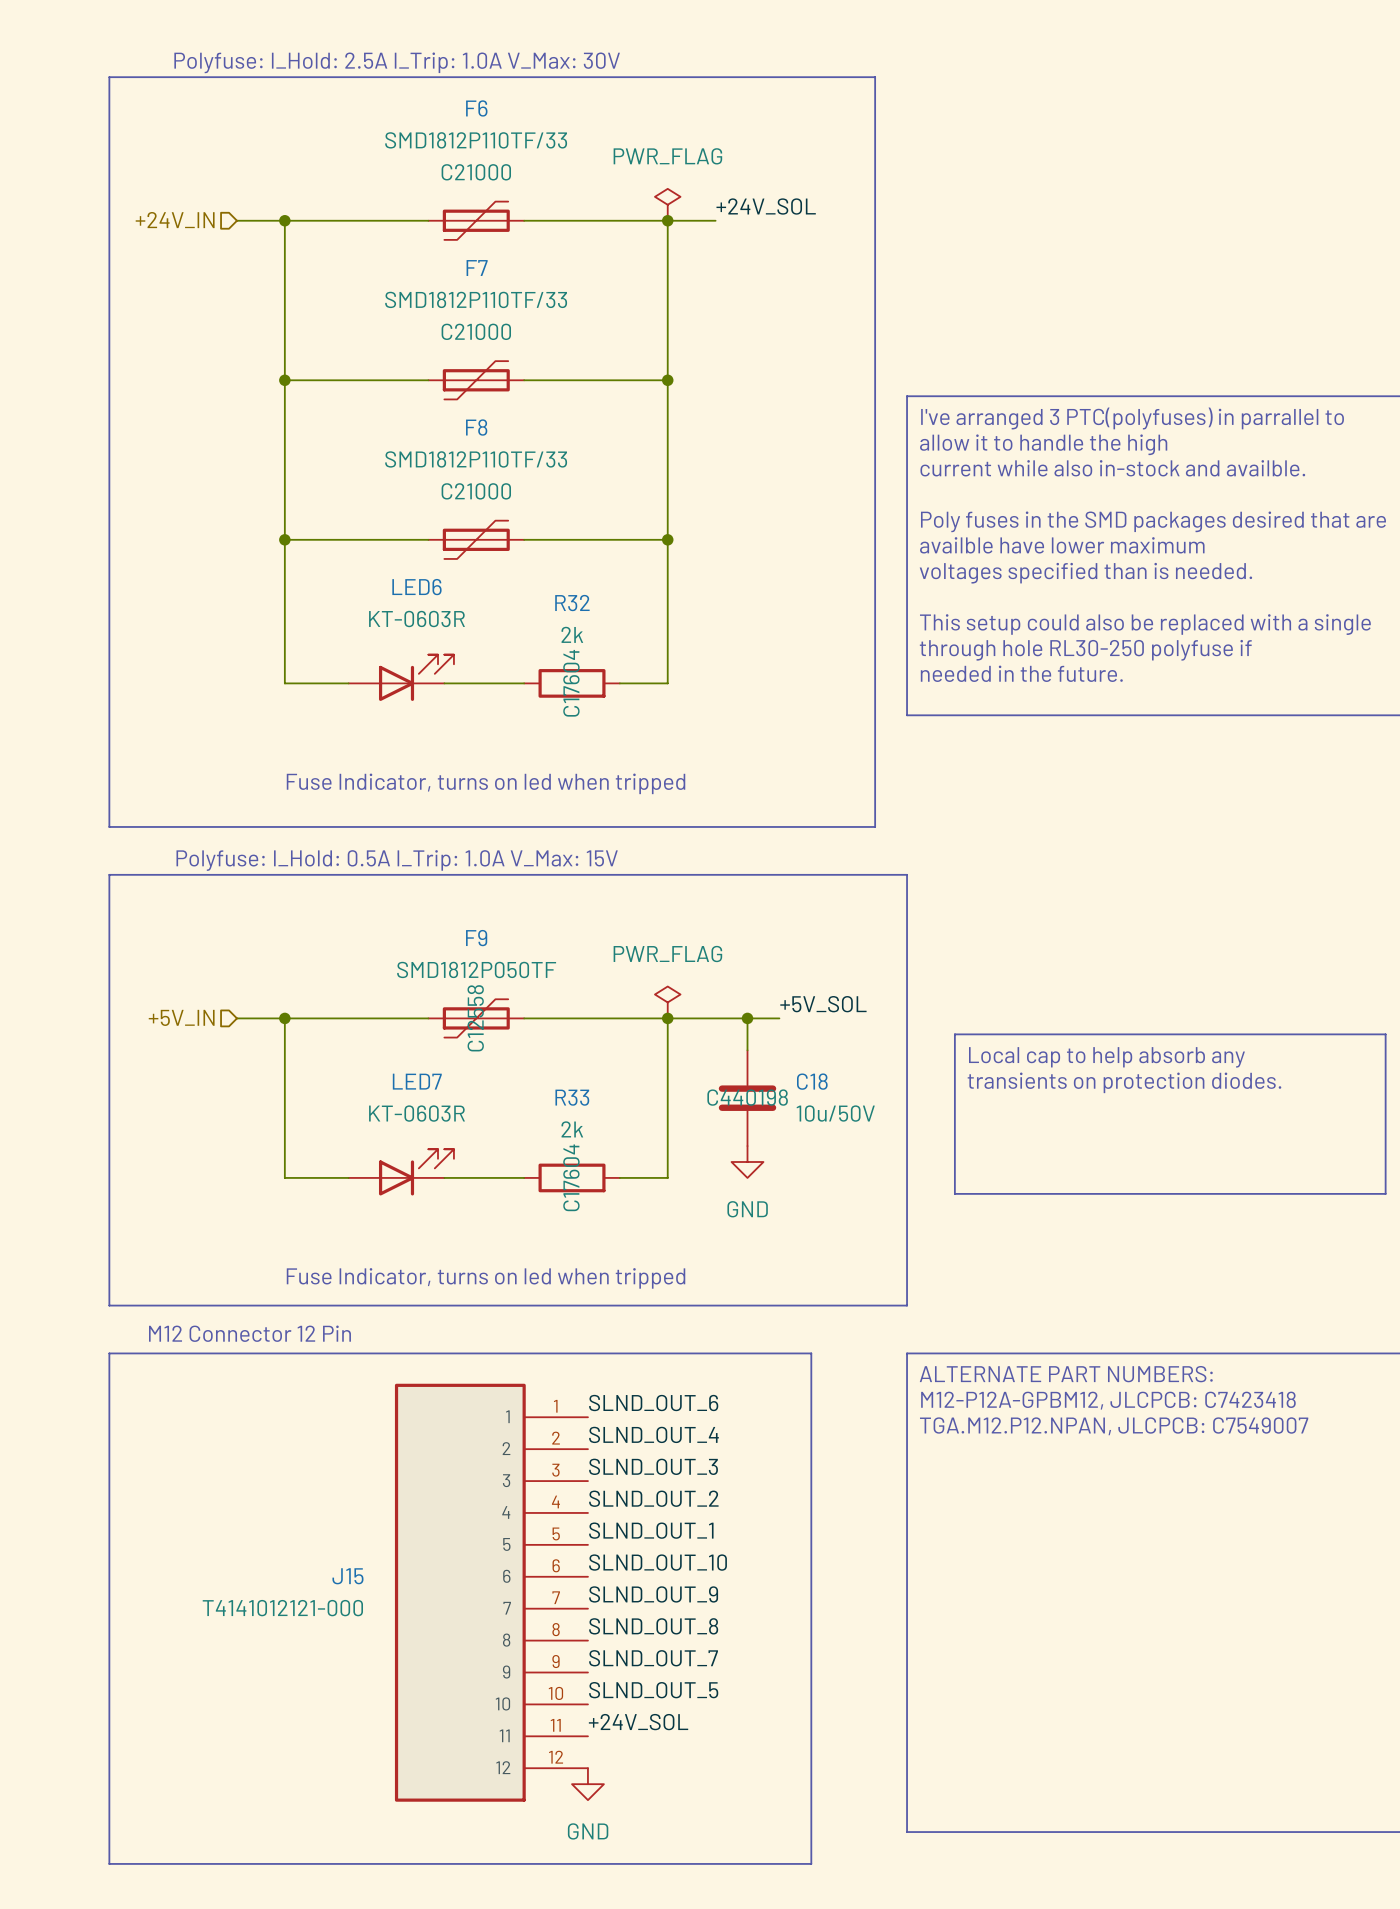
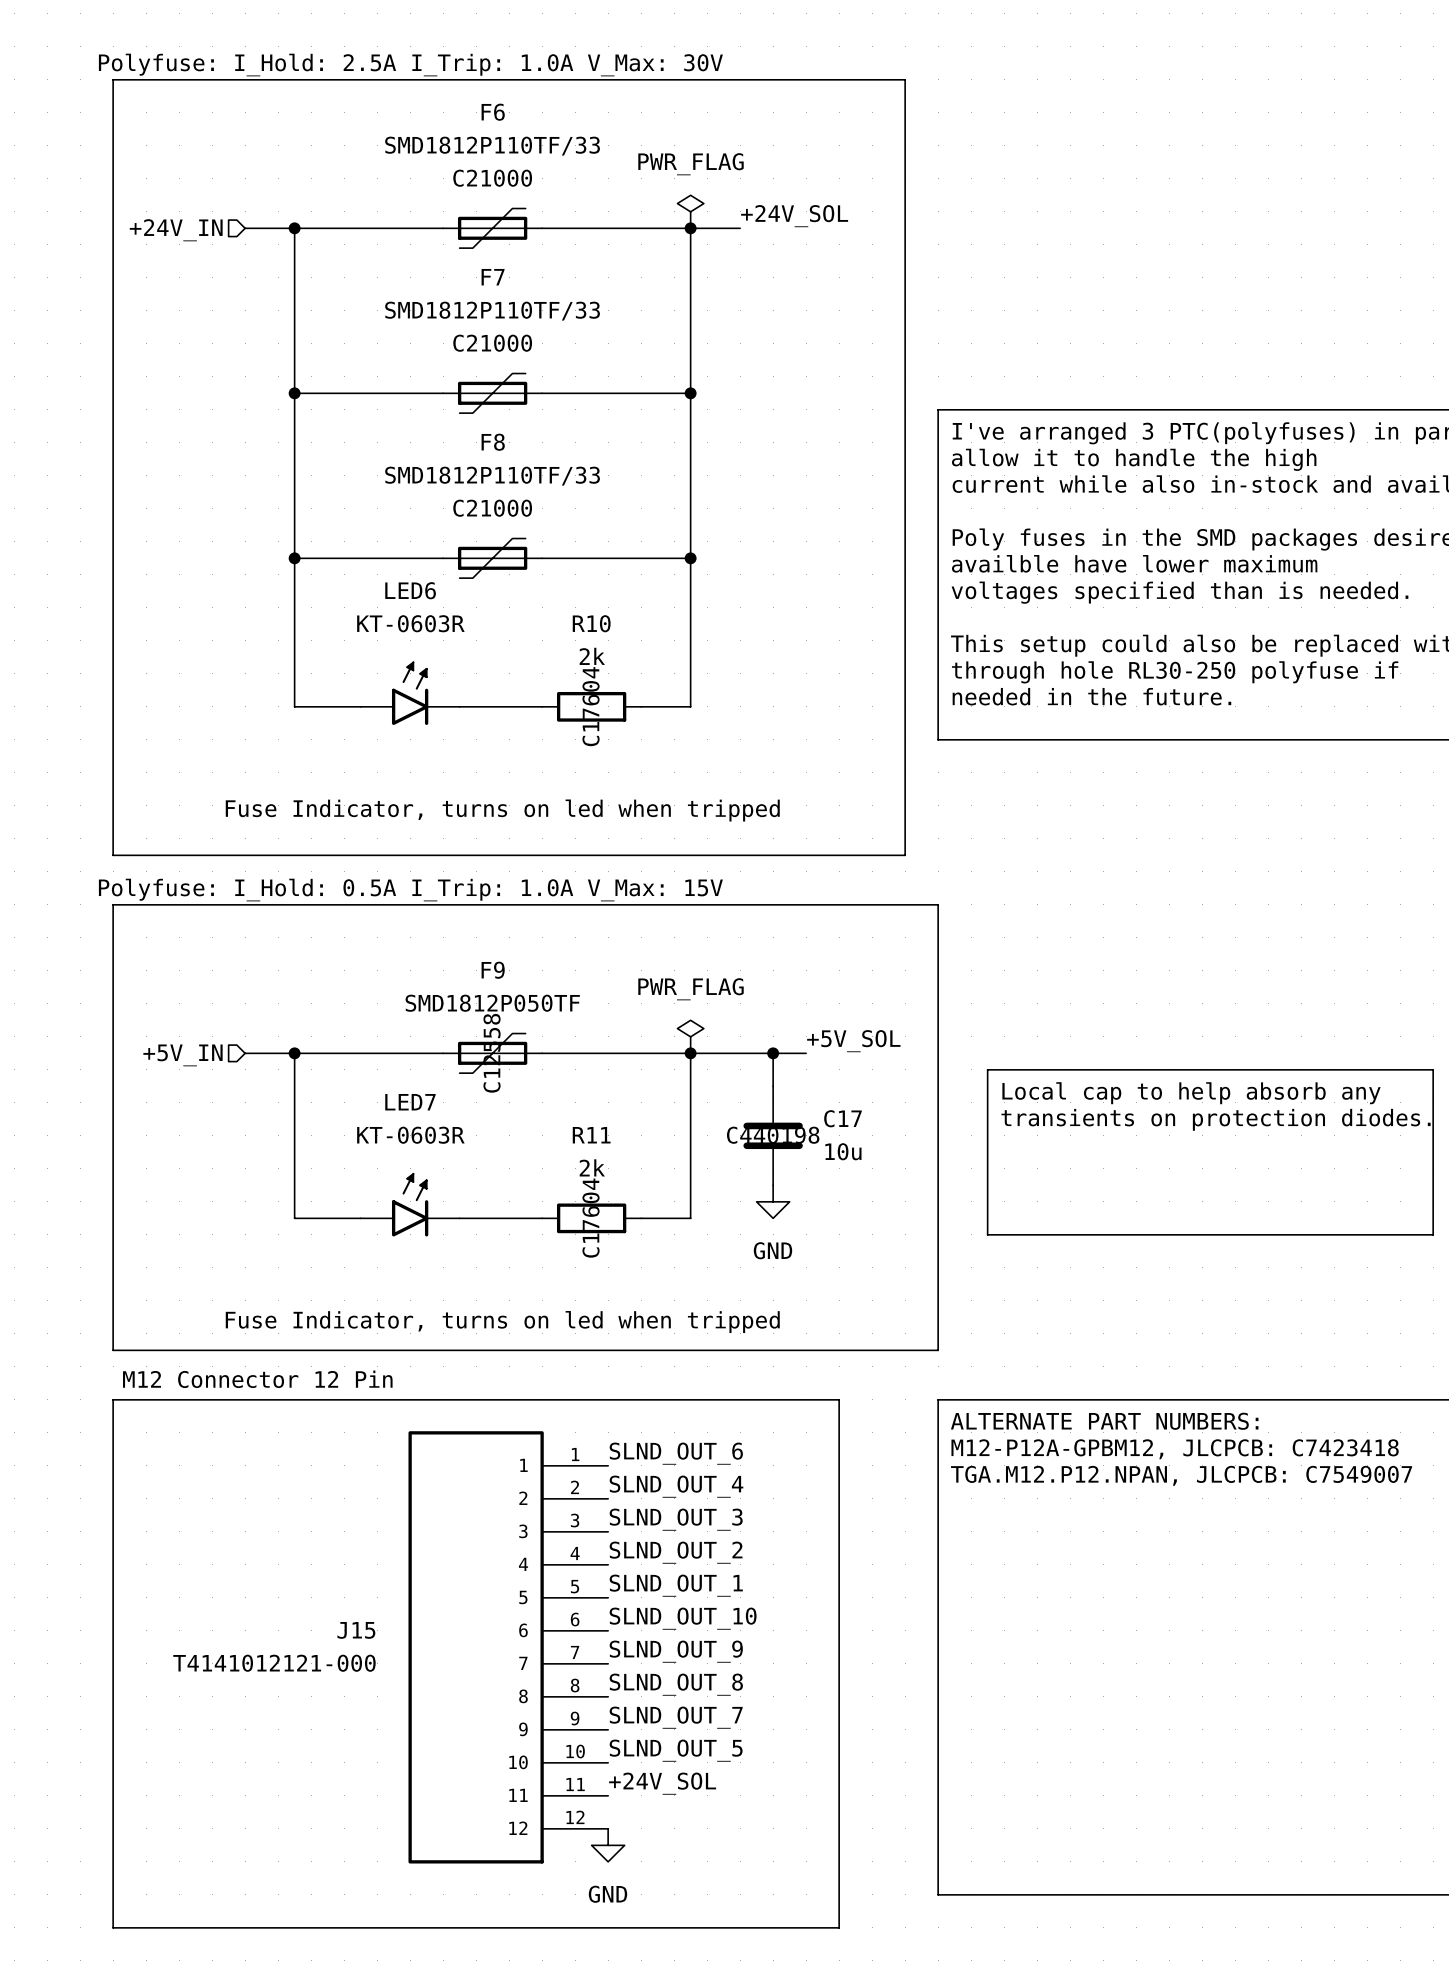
R32 name: R32 (572, 603) -> R10 (591, 623)
LED6 symbol: [348, 654, 454, 701] -> [360, 661, 460, 725]
C18 name: C18 (812, 1081) -> C17 (842, 1118)
R33 name: R33 (572, 1097) -> R11 (591, 1135)
C18 value: 10u/50V (835, 1113) -> 10u (843, 1151)
LED7 symbol: [348, 1149, 454, 1196] -> [360, 1172, 460, 1237]

